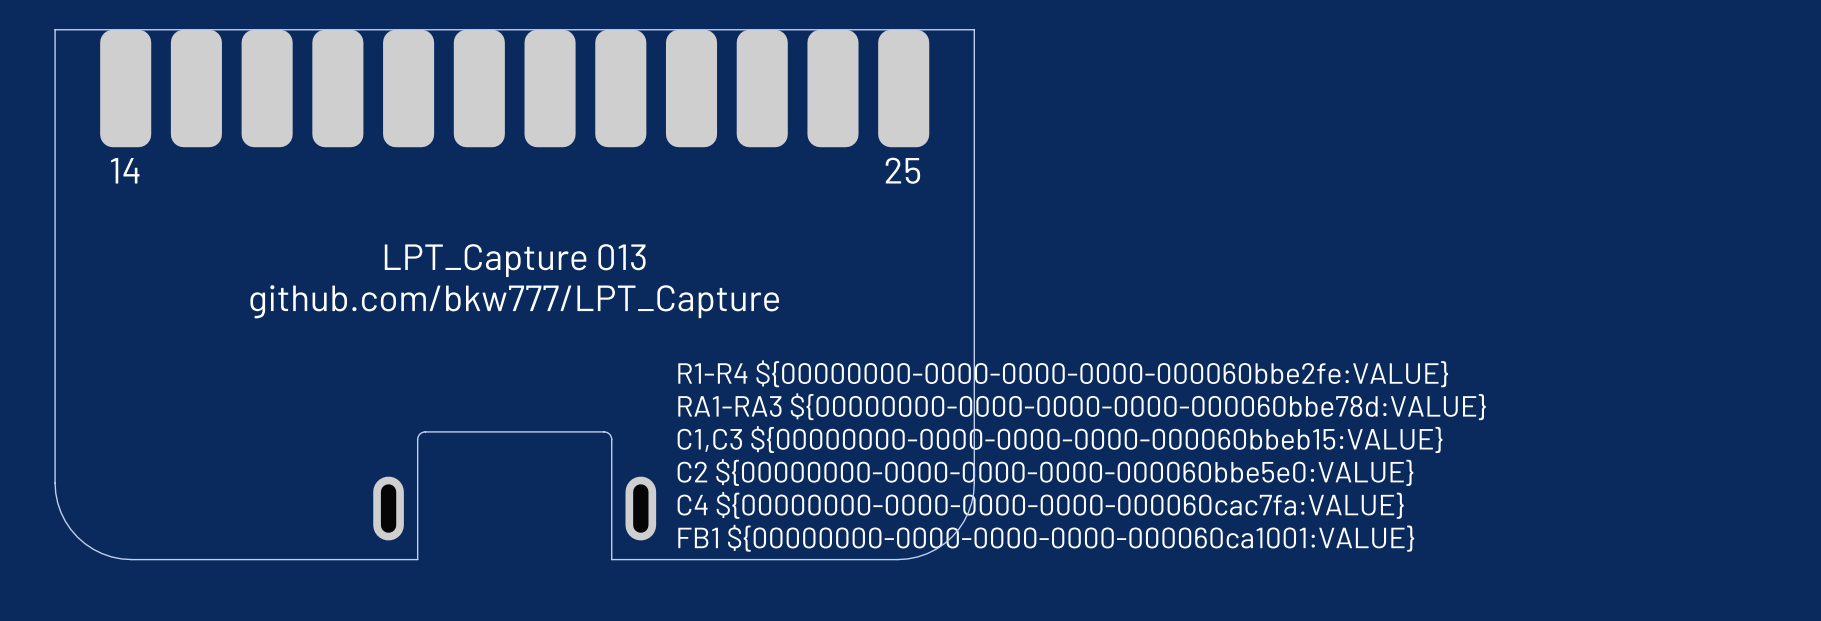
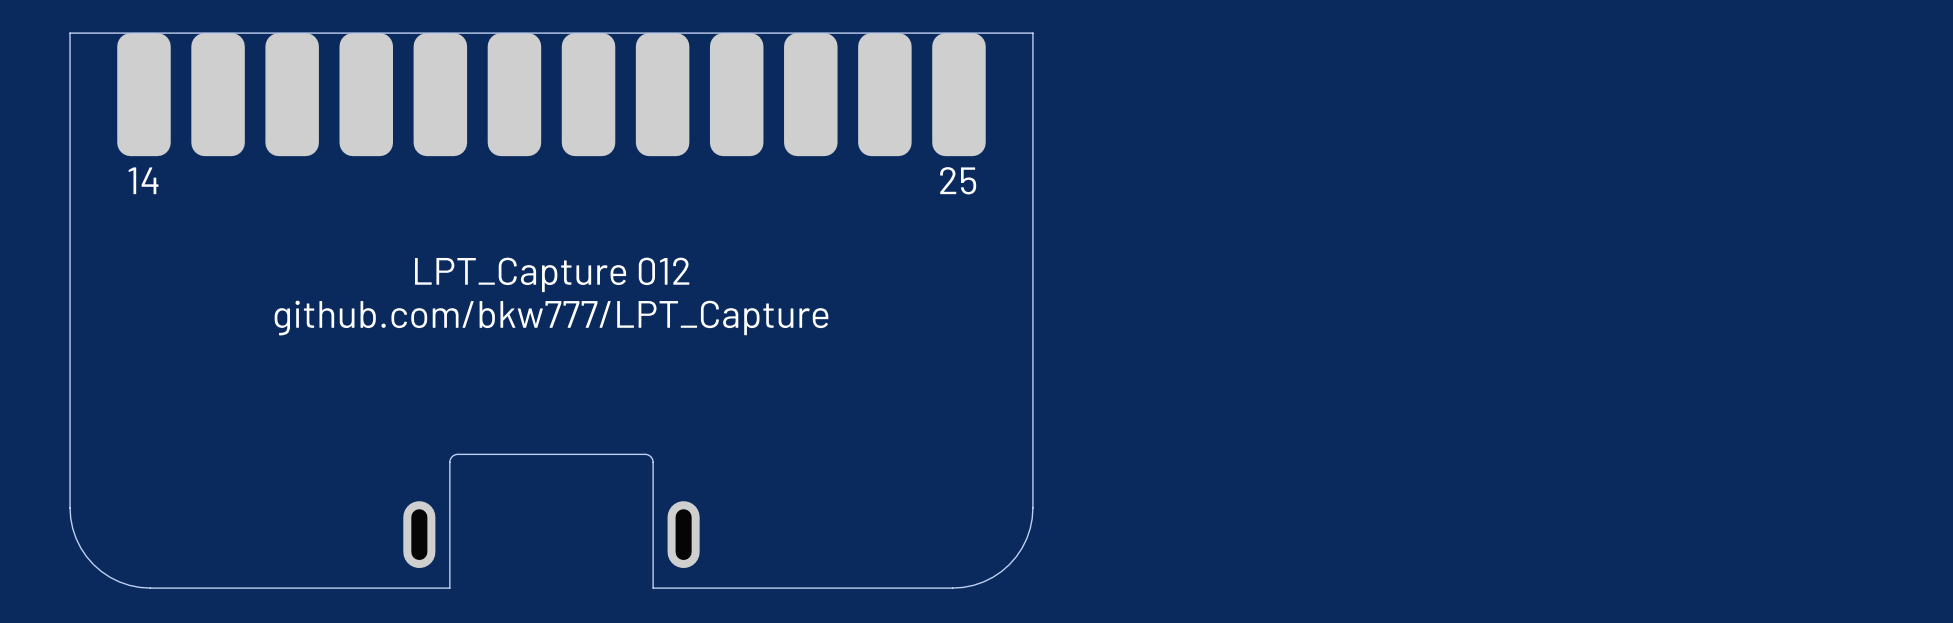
text: LPT_Capture 013 (515, 260) -> LPT_Capture 012 (552, 274)
text: R1-R4 ${00000000-0000-0000-0000-000060bbe2fe:VALUE} (1063, 373) -> none
text: RA1-RA3 ${00000000-0000-0000-0000-000060bbe78d:VALUE} (1082, 406) -> none
text: C1,C3 ${00000000-0000-0000-0000-000060bbeb15:VALUE} (1060, 439) -> none
text: C2 ${00000000-0000-0000-0000-000060bbe5e0:VALUE} (1045, 472) -> none
text: C4 ${00000000-0000-0000-0000-000060cac7fa:VALUE} (1040, 505) -> none
text: FB1 ${00000000-0000-0000-0000-000060ca1001:VALUE} (1046, 538) -> none

